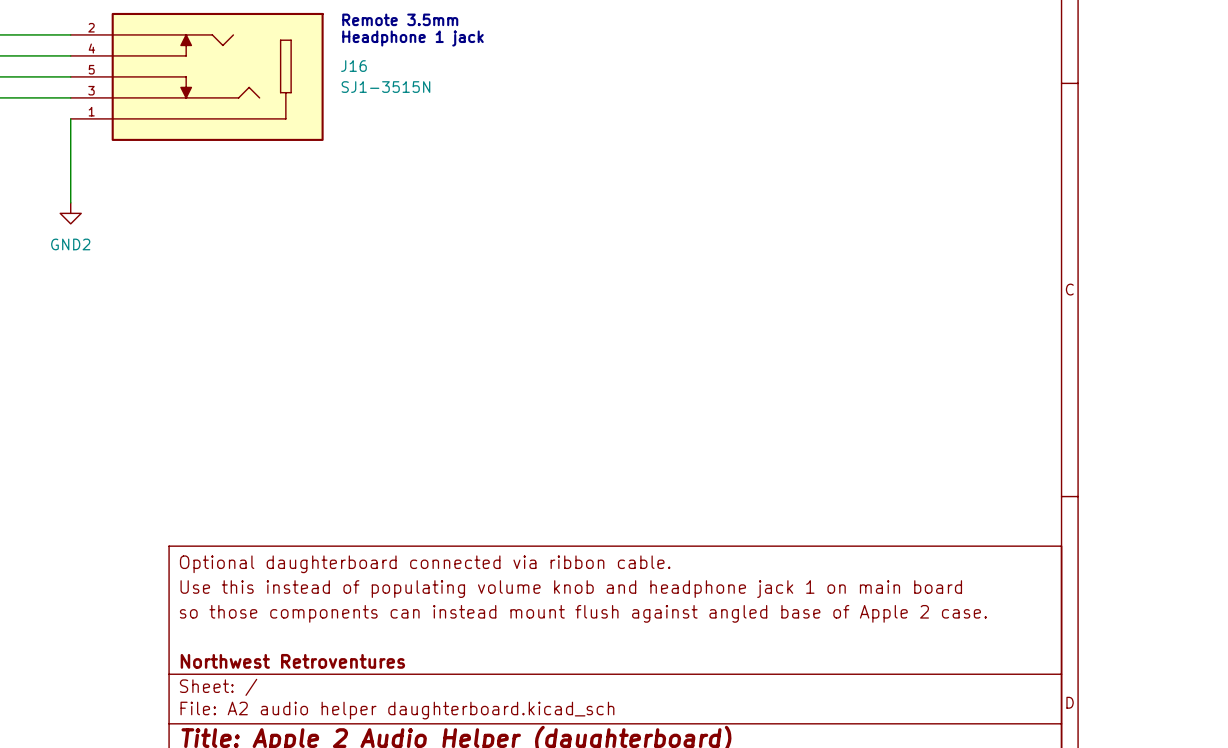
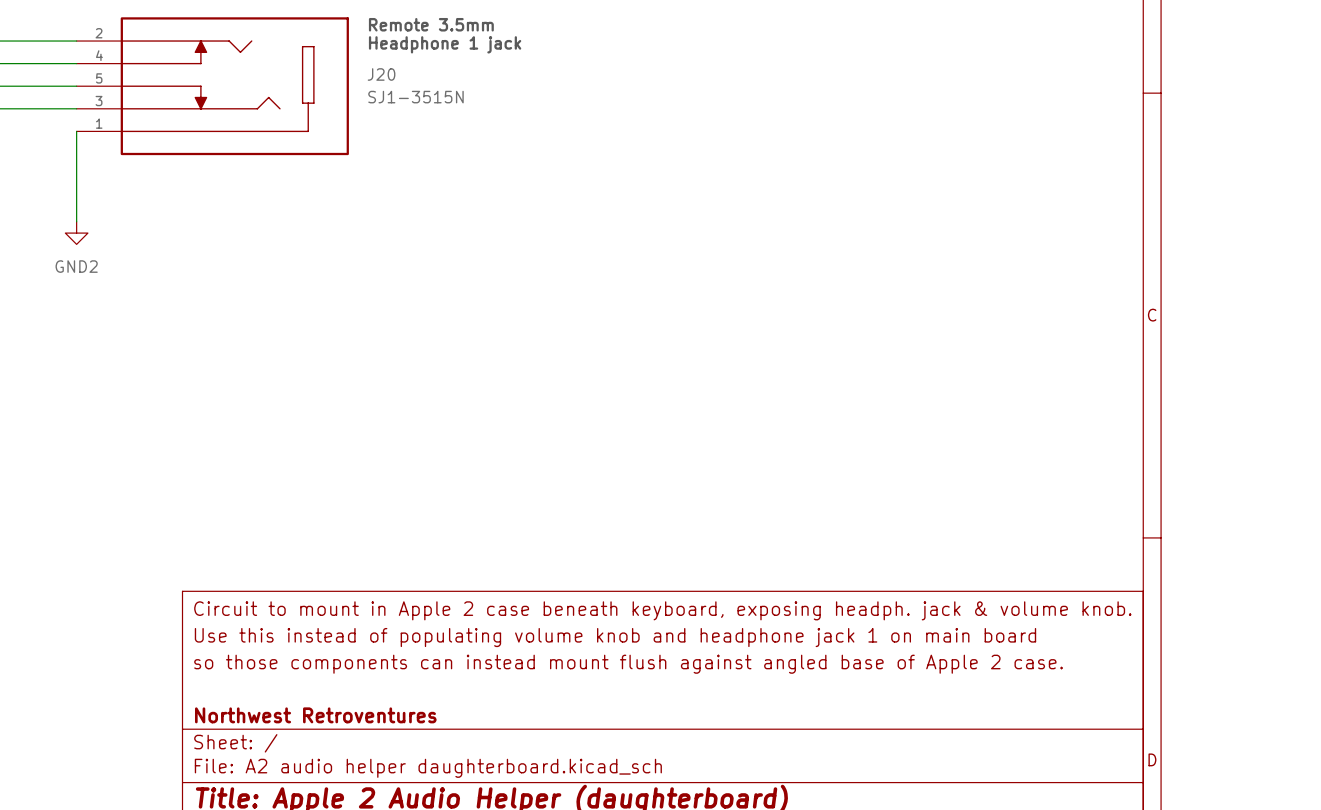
J16 name: J16 (353, 66) -> J20 (381, 74)
title block: Optional daughterboard connected via ribbon cable. (425, 564) -> Circuit to mount in Apple 2 case beneath keyboard, exposing headph. jack & volume knob. (662, 610)

